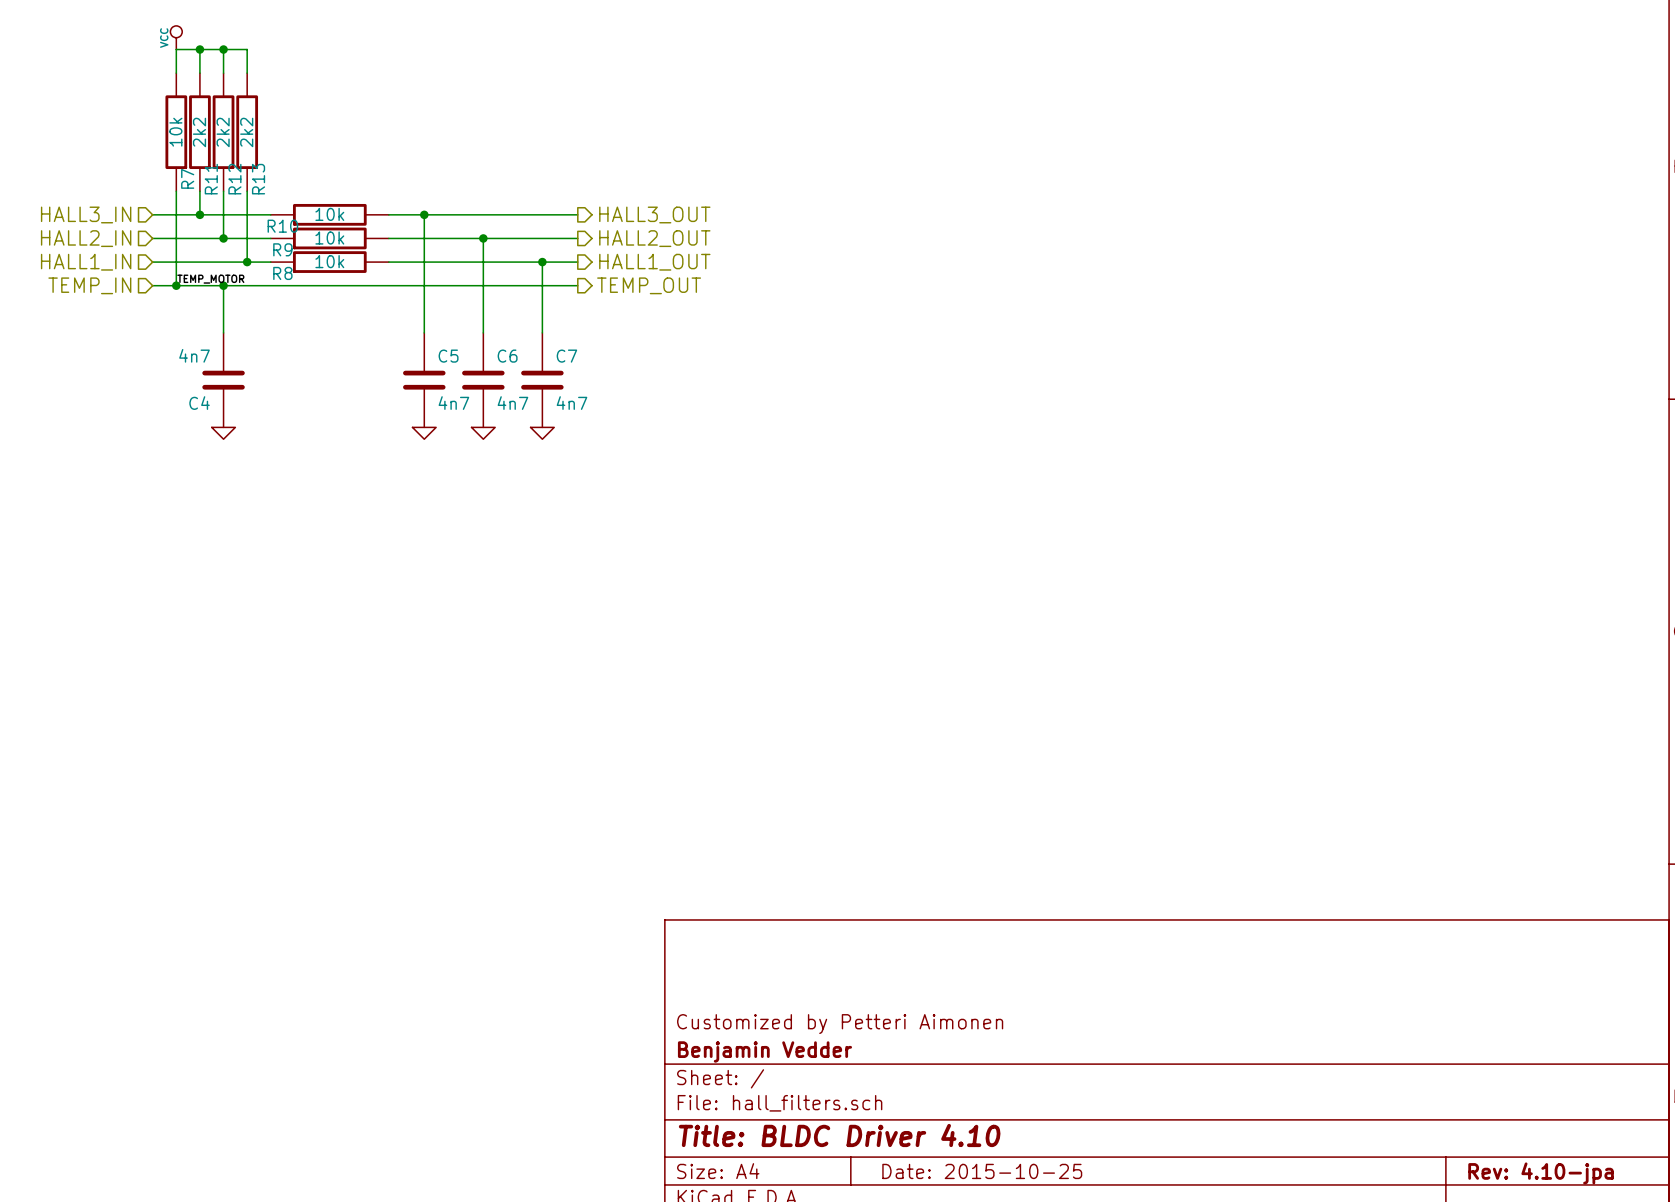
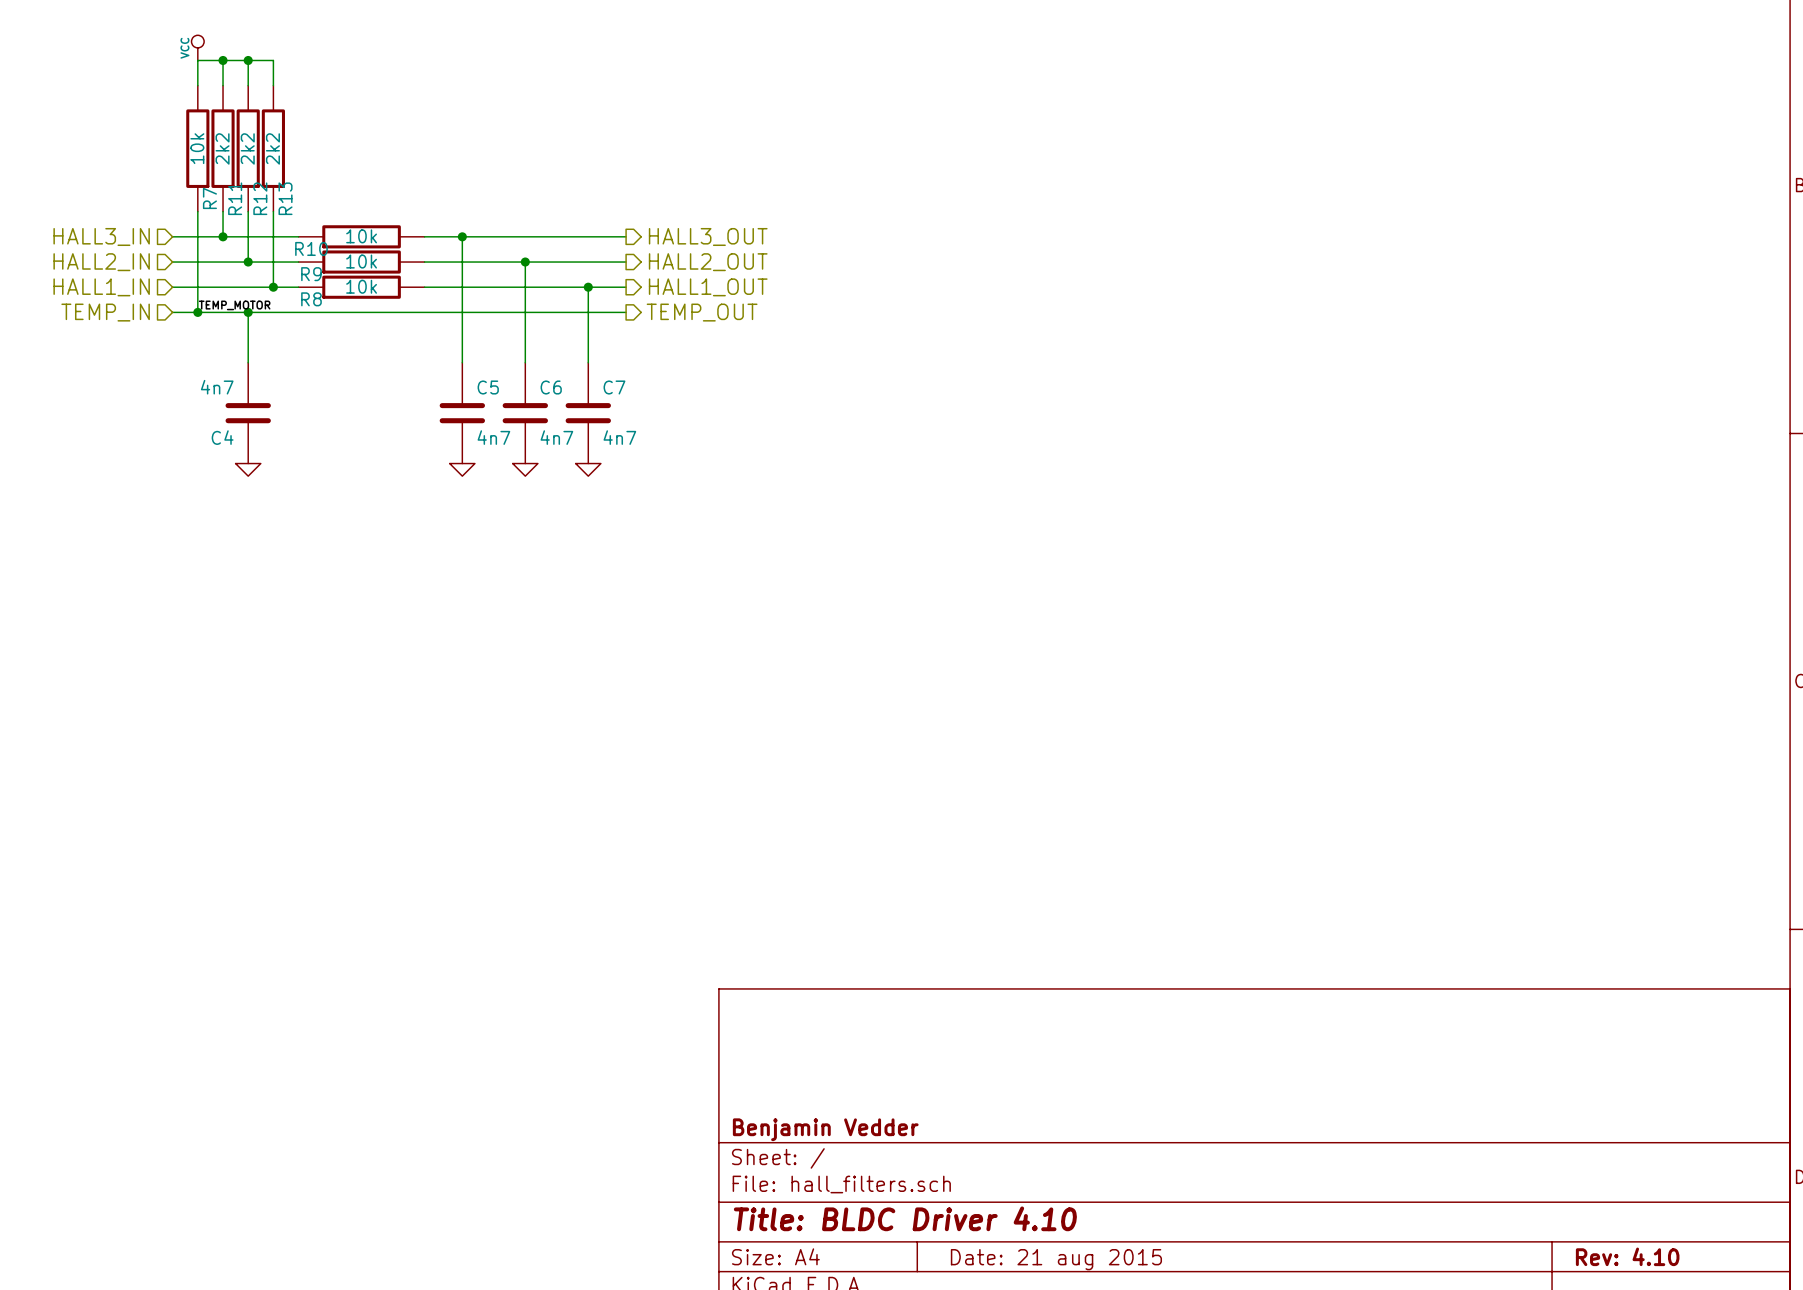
title block: Customized by Petteri Aimonen (840, 1024) -> none
title block: Date: 2015-10-25 (982, 1171) -> Date: 21 aug 2015 (1056, 1259)
title block: Rev: 4.10-jpa (1541, 1173) -> Rev: 4.10 (1627, 1256)

